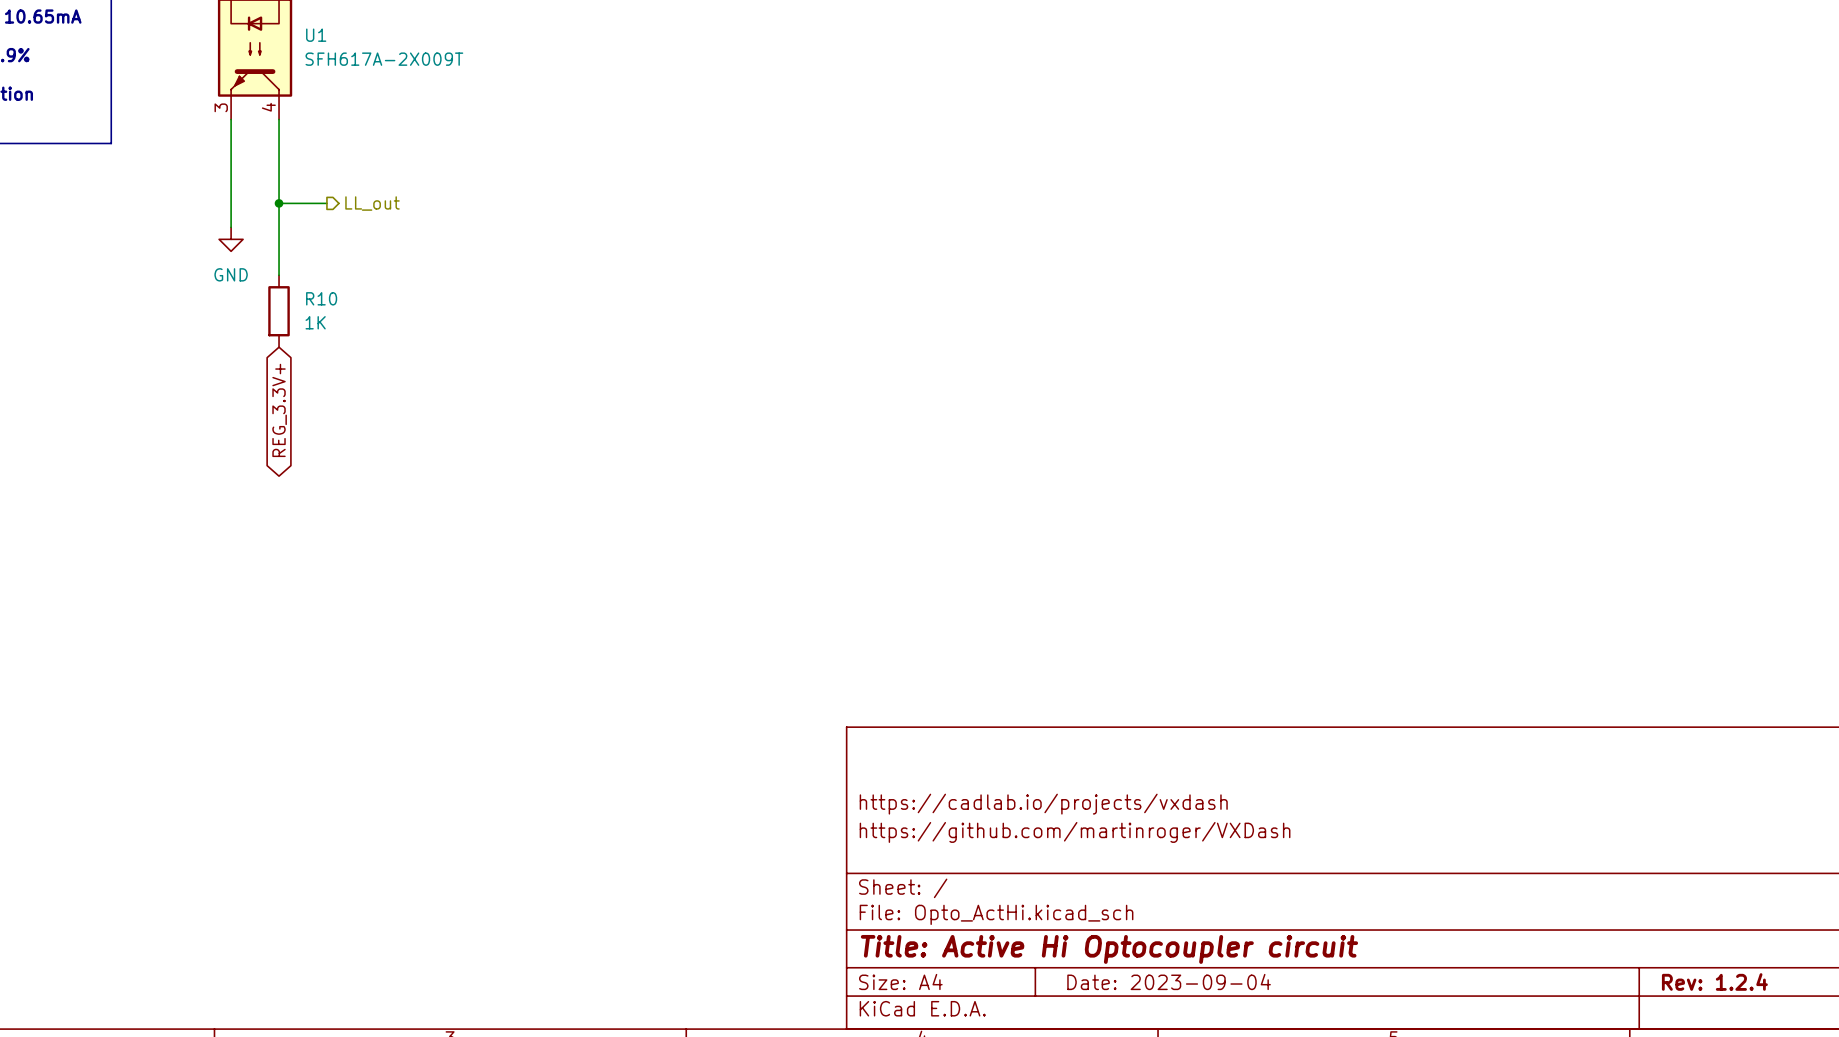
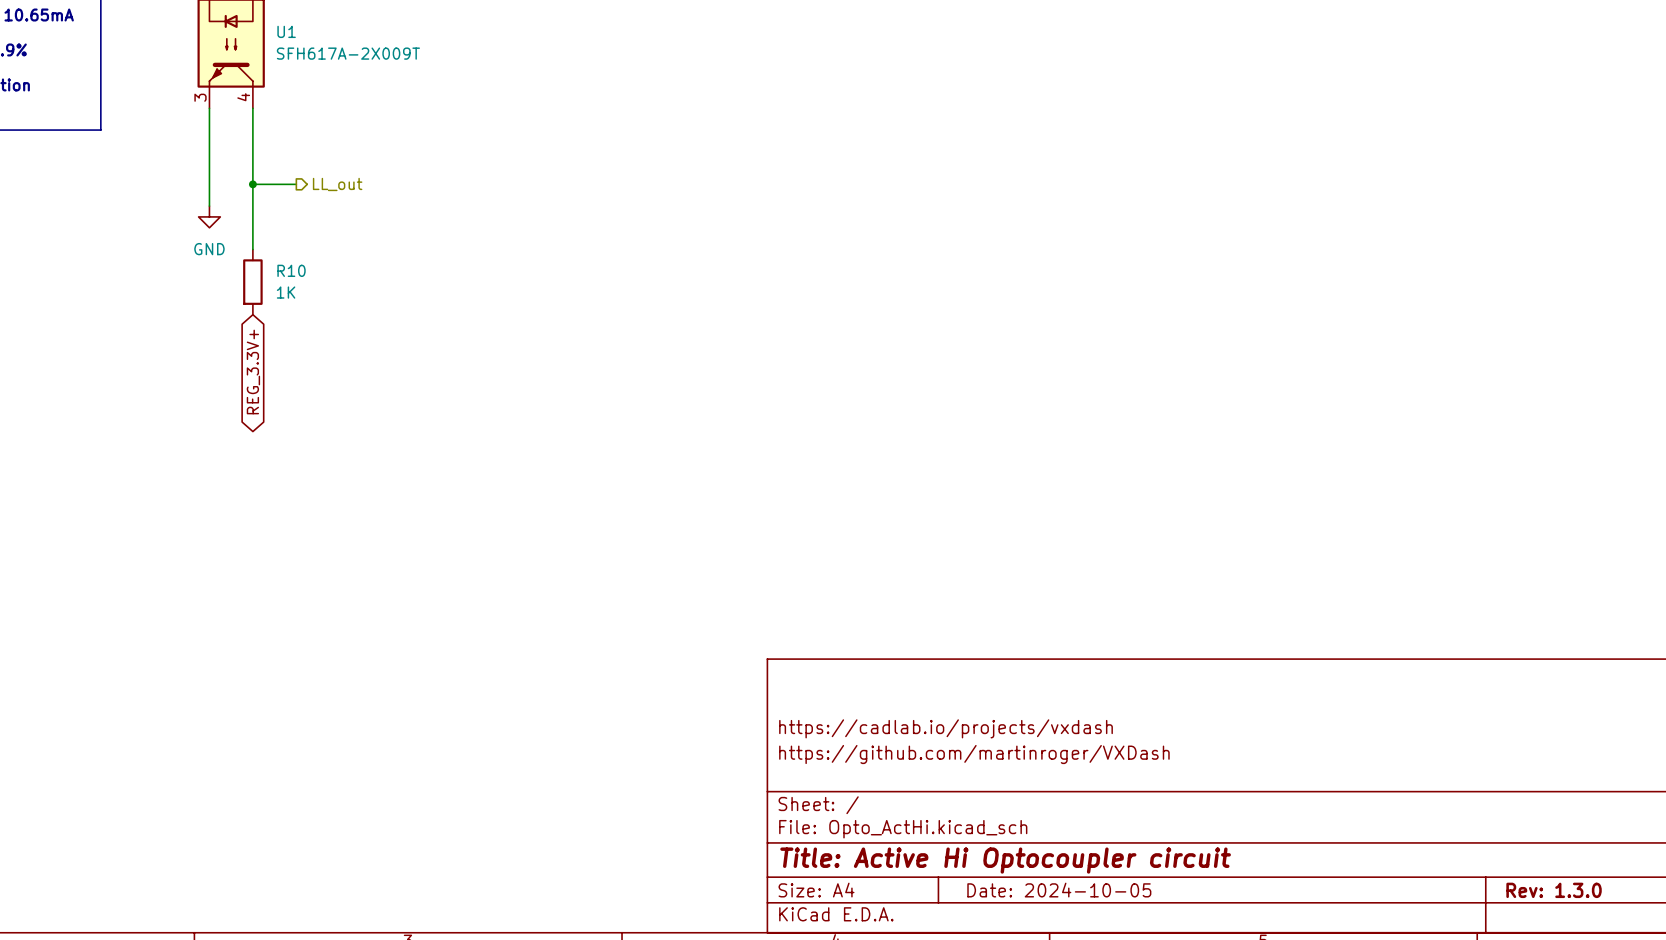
title block: Date: 2023-09-04 (1169, 981) -> Date: 2024-10-05 (1059, 890)
title block: Rev: 1.2.4 (1714, 981) -> Rev: 1.3.0 (1554, 890)

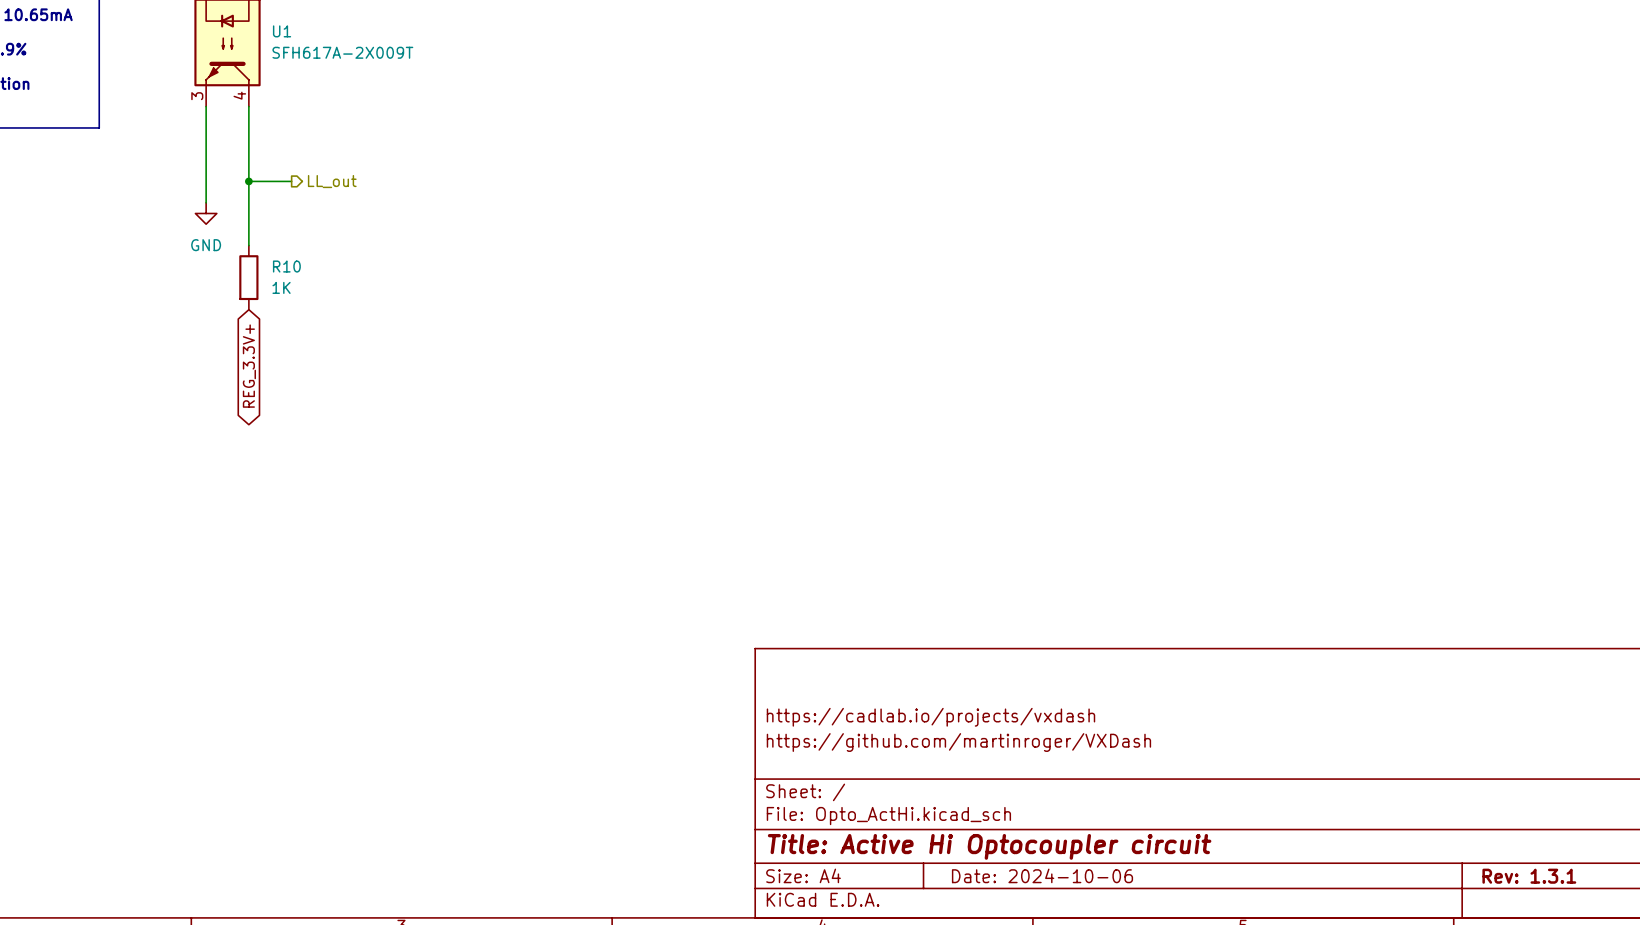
title block: Date: 2024-10-05 (1059, 890) -> Date: 2024-10-06 (1042, 875)
title block: Rev: 1.3.0 (1554, 890) -> Rev: 1.3.1 (1529, 876)

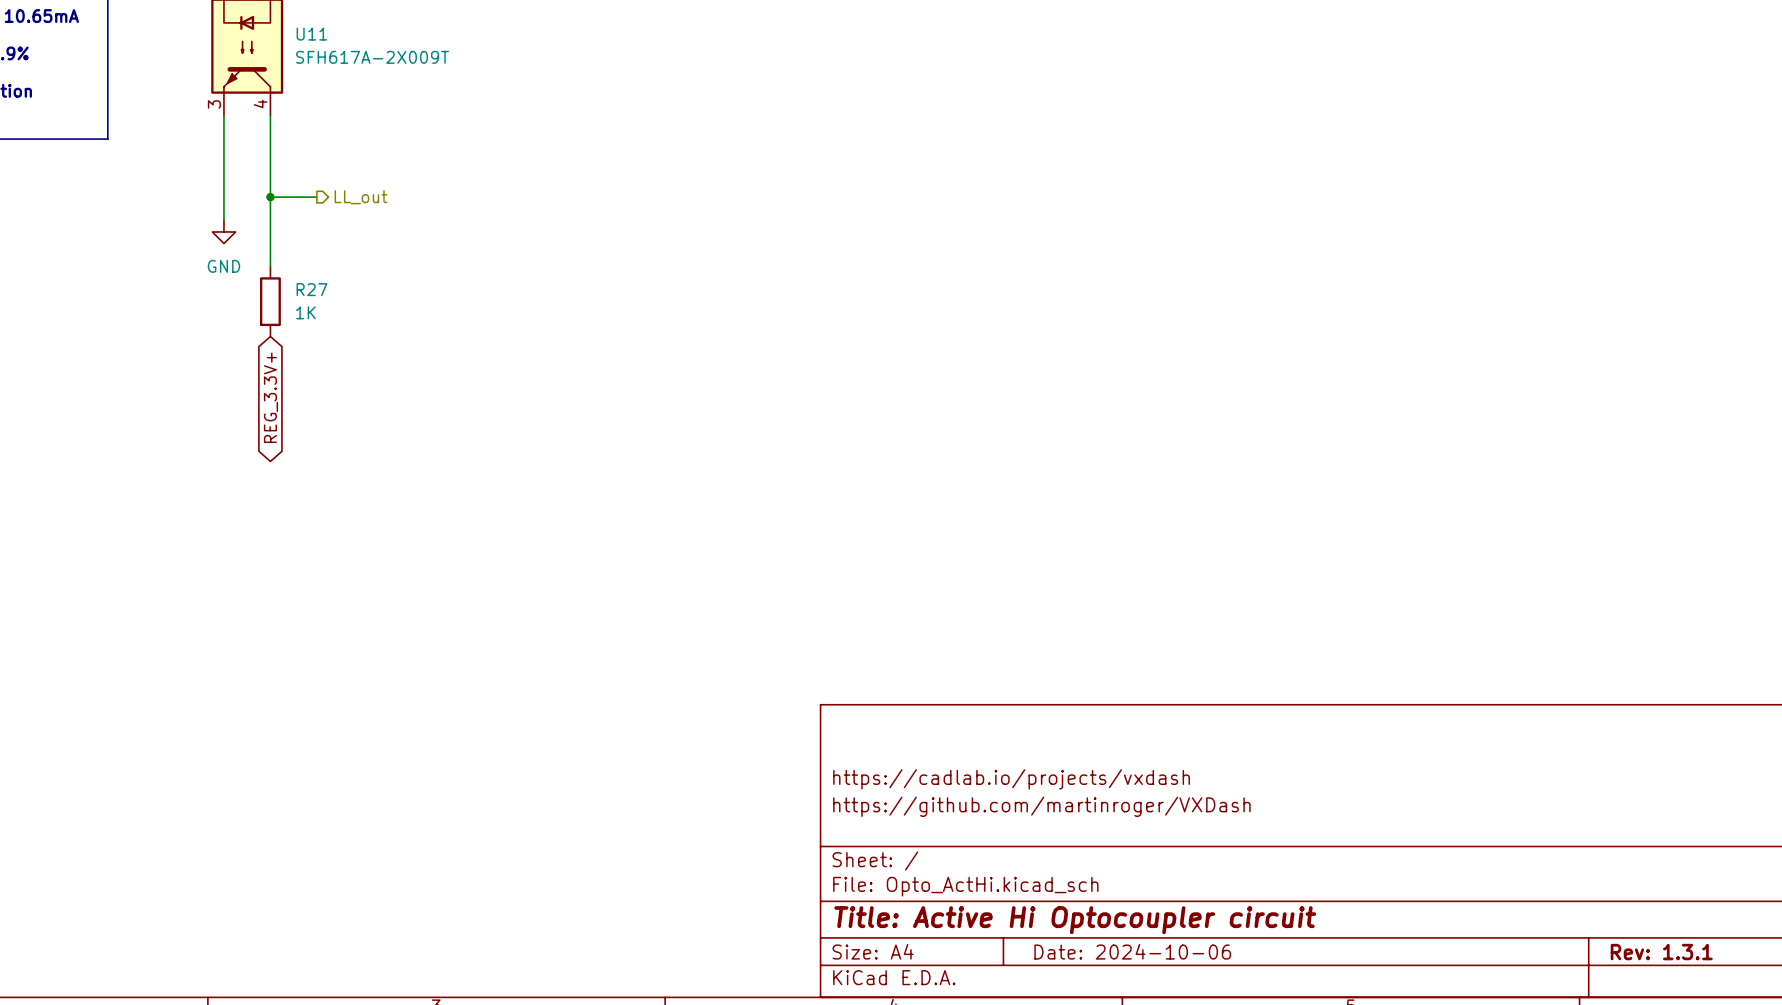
U1 name: U1 (282, 31) -> U11 (311, 34)
R10 name: R10 (286, 266) -> R27 (311, 289)

